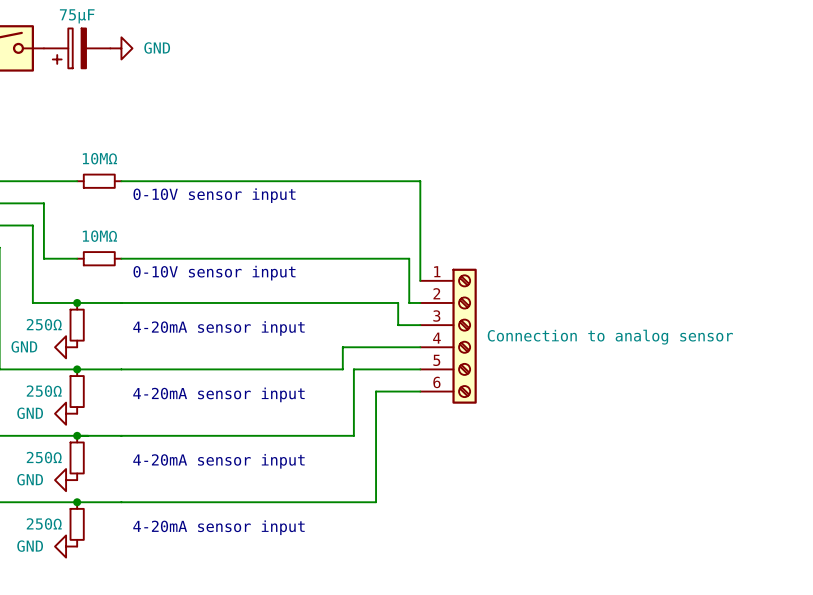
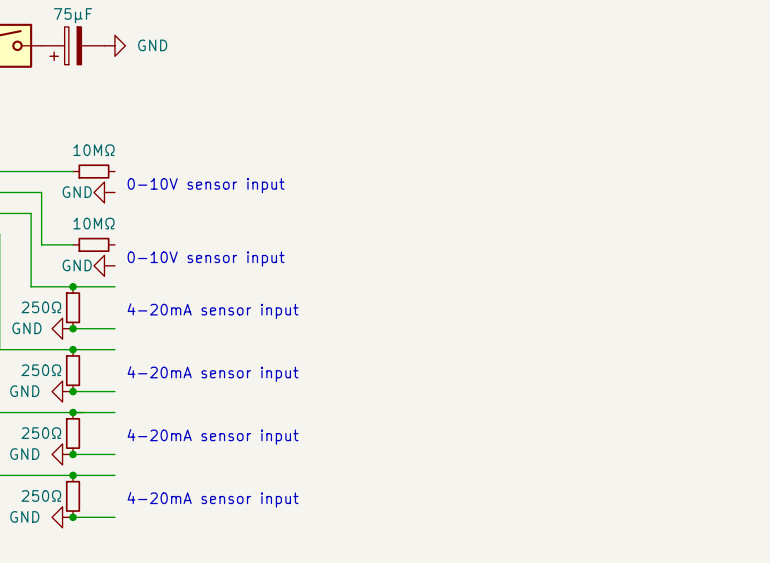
wire: (121, 181) (420, 181) (420, 280) -> none
power symbol: none -> GND (104, 192)
wire: (121, 258) (409, 258) (409, 302) (420, 302) -> none
power symbol: none -> GND (104, 265)
wire: (121, 302) (398, 302) (398, 325) (420, 325) -> none
part: Connection to analog sensor (448, 336) -> none
wire: none -> (73, 328) (114, 328)
junction: none -> (73, 328)
wire: (420, 347) (342, 347) (342, 369) (121, 369) -> none
wire: (420, 369) (353, 369) (353, 435) (121, 435) -> none
wire: (420, 391) (376, 391) (376, 502) (121, 502) -> none
wire: none -> (73, 391) (114, 391)
junction: none -> (73, 391)
wire: none -> (73, 454) (114, 454)
junction: none -> (73, 454)
wire: none -> (73, 517) (114, 517)
junction: none -> (73, 517)

